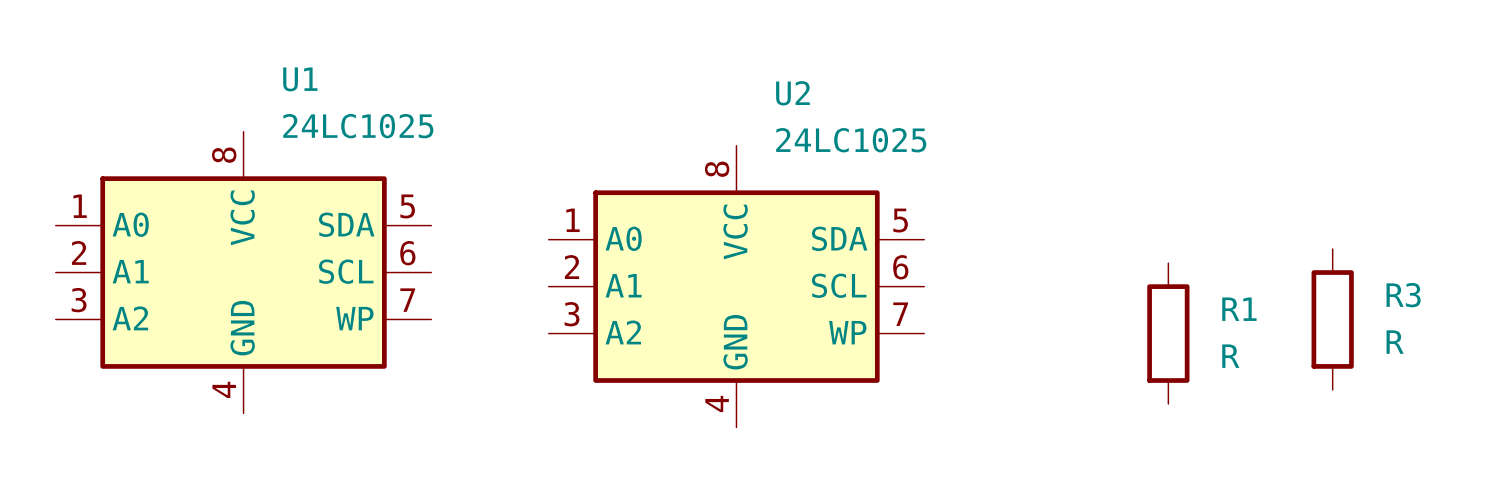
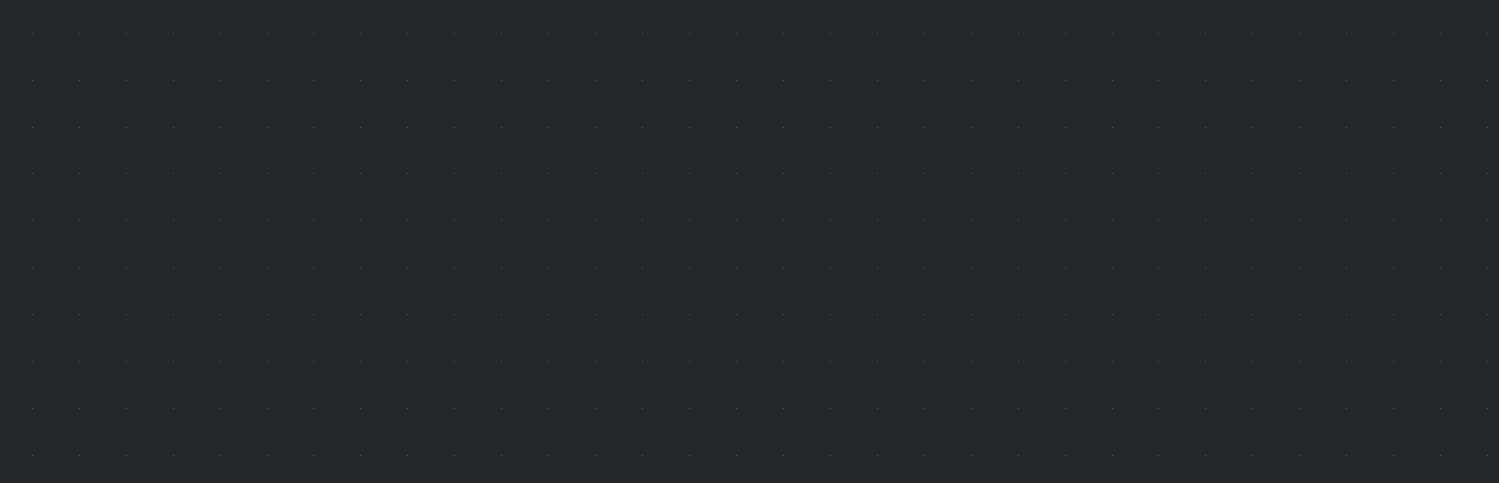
U1: 24LC1025 (243, 272) -> none
U2: 24LC1025 (736, 286) -> none
R3: R (1332, 319) -> none
R1: R (1168, 333) -> none

